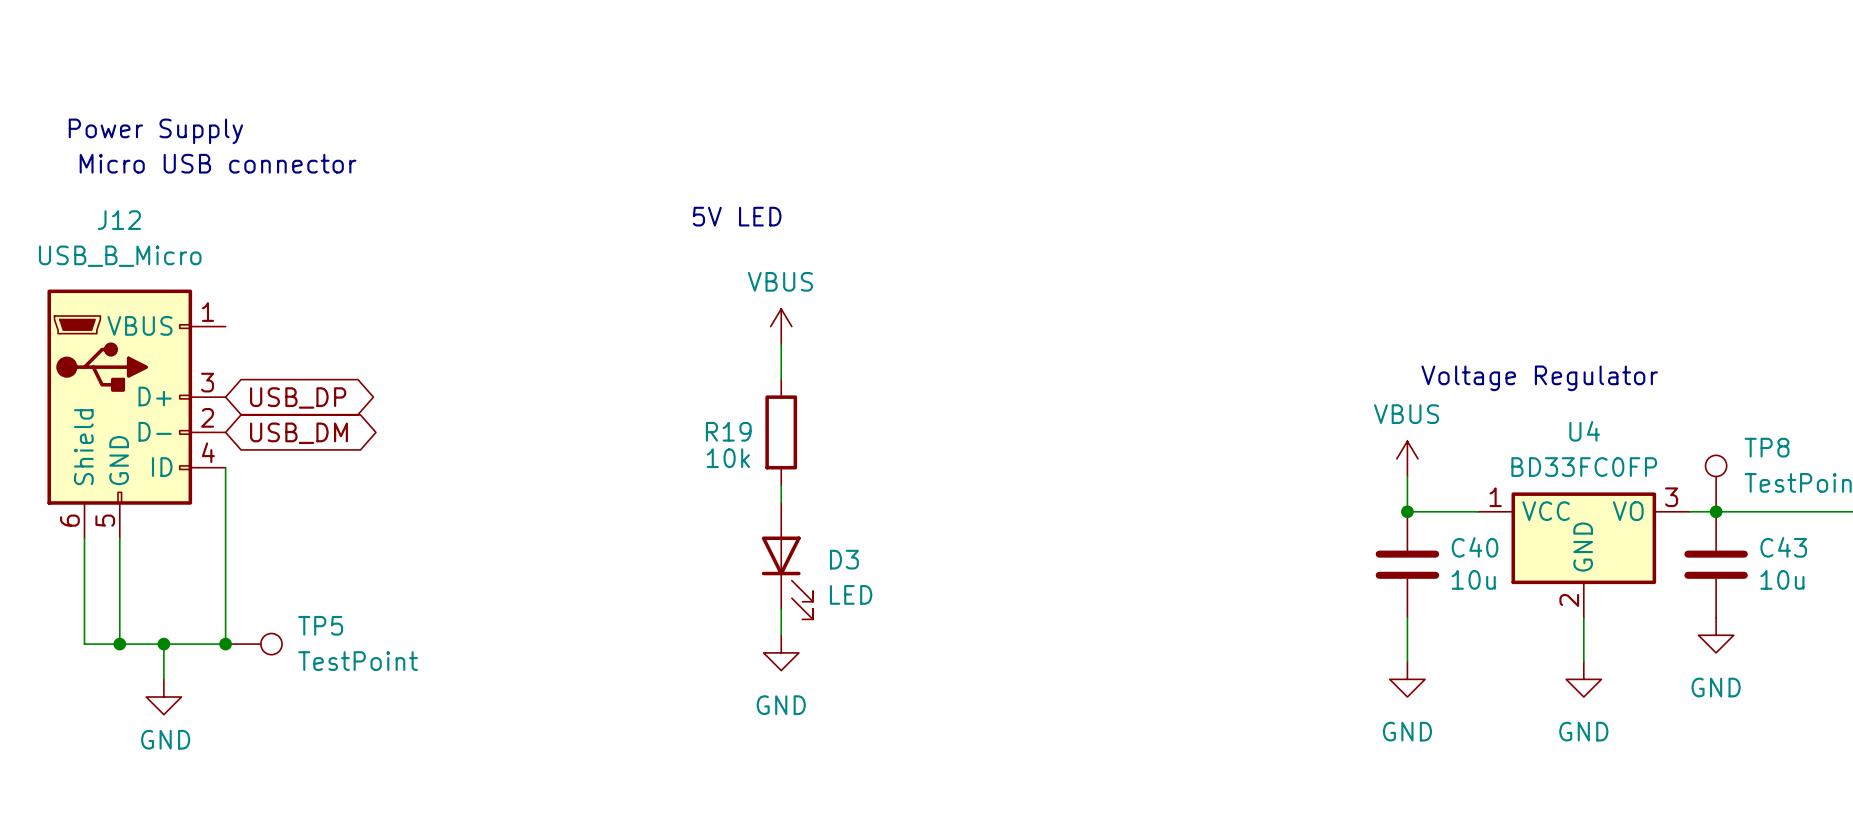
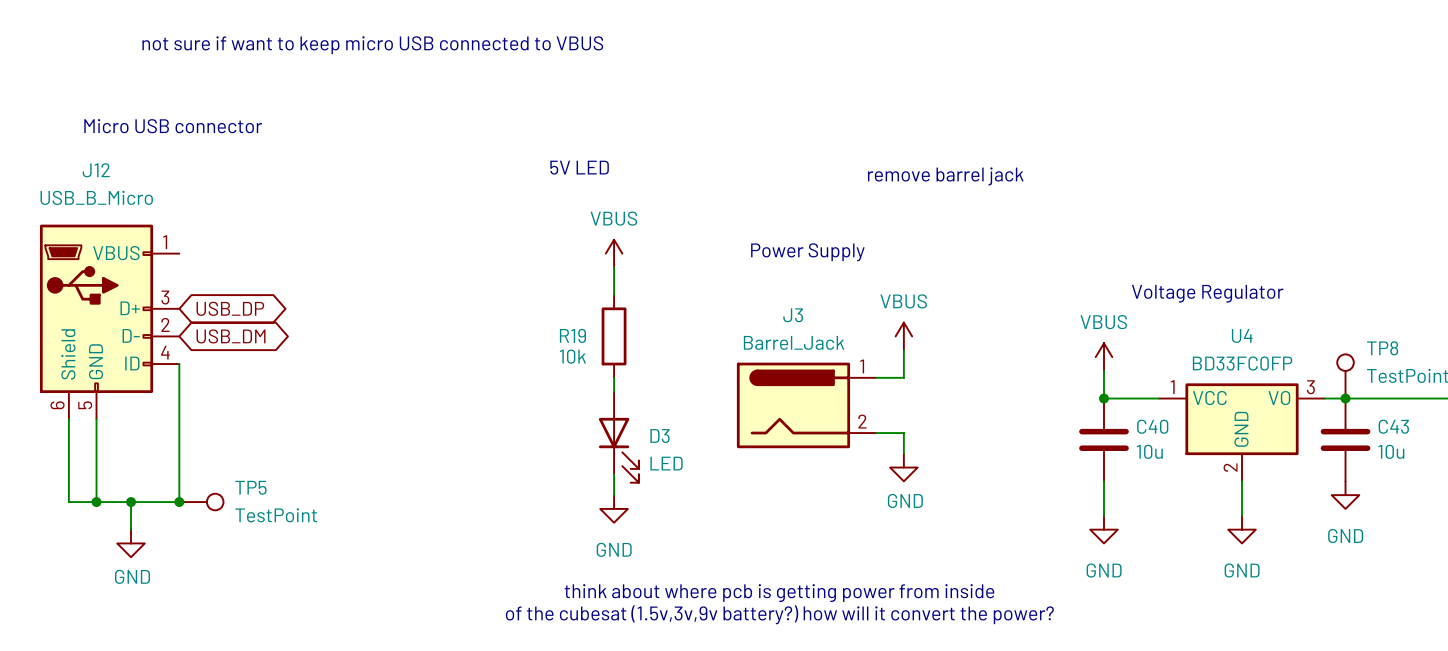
text: none -> not sure if want to keep micro USB connected to VBUS (372, 45)
text: Power Supply (155, 131) -> none
text: none -> remove barrel jack (945, 176)
text: none -> Power Supply (807, 252)
power symbol: none -> VBUS (903, 336)
wire: none -> (903, 350) (903, 377) (876, 377)
J3: none -> Barrel_Jack (806, 405)
wire: none -> (876, 433) (903, 433) (903, 453)
power symbol: none -> GND (903, 467)
text: none -> think about where pcb is getting power from inside (779, 593)
text: none -> of the cubesat (1.5v,3v,9v battery?) how will it convert the power? (779, 614)

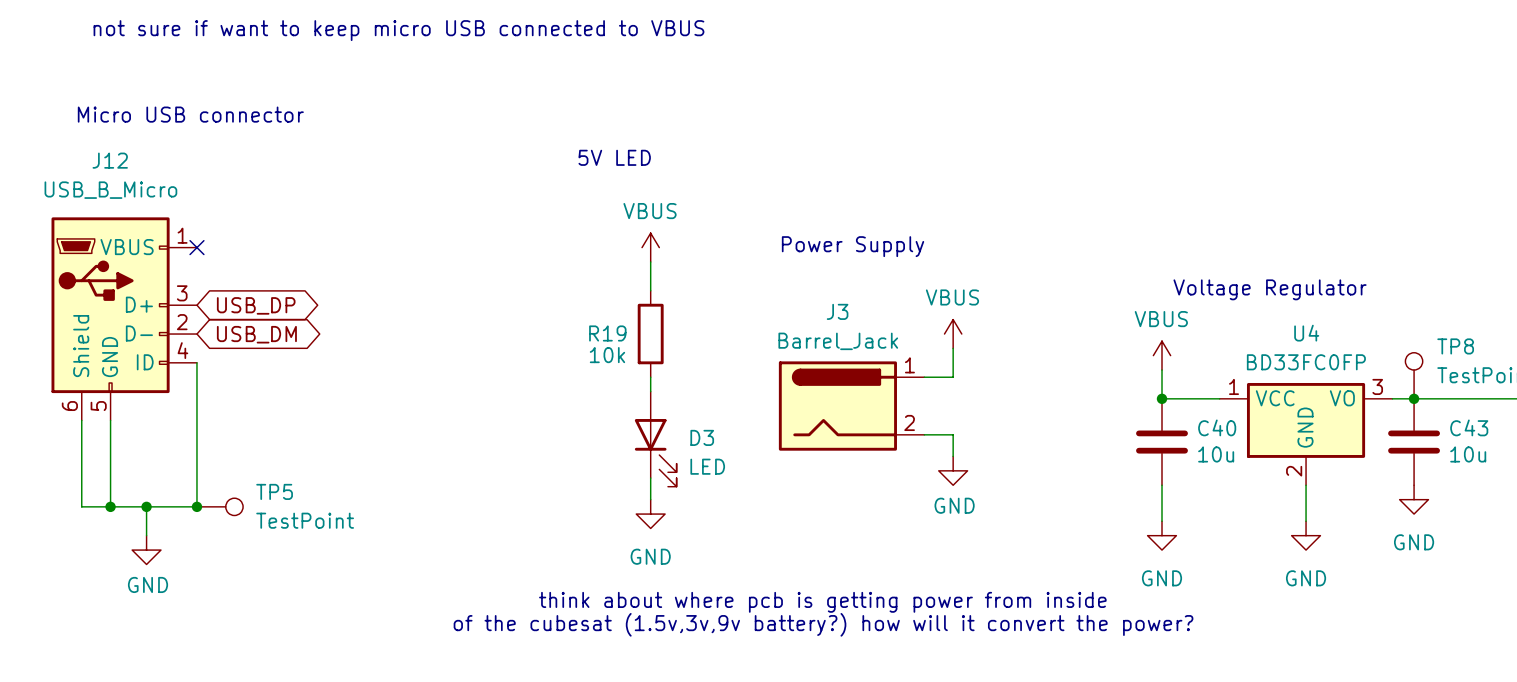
text: remove barrel jack (945, 176) -> none
no-connect mark: none -> (196, 247)

